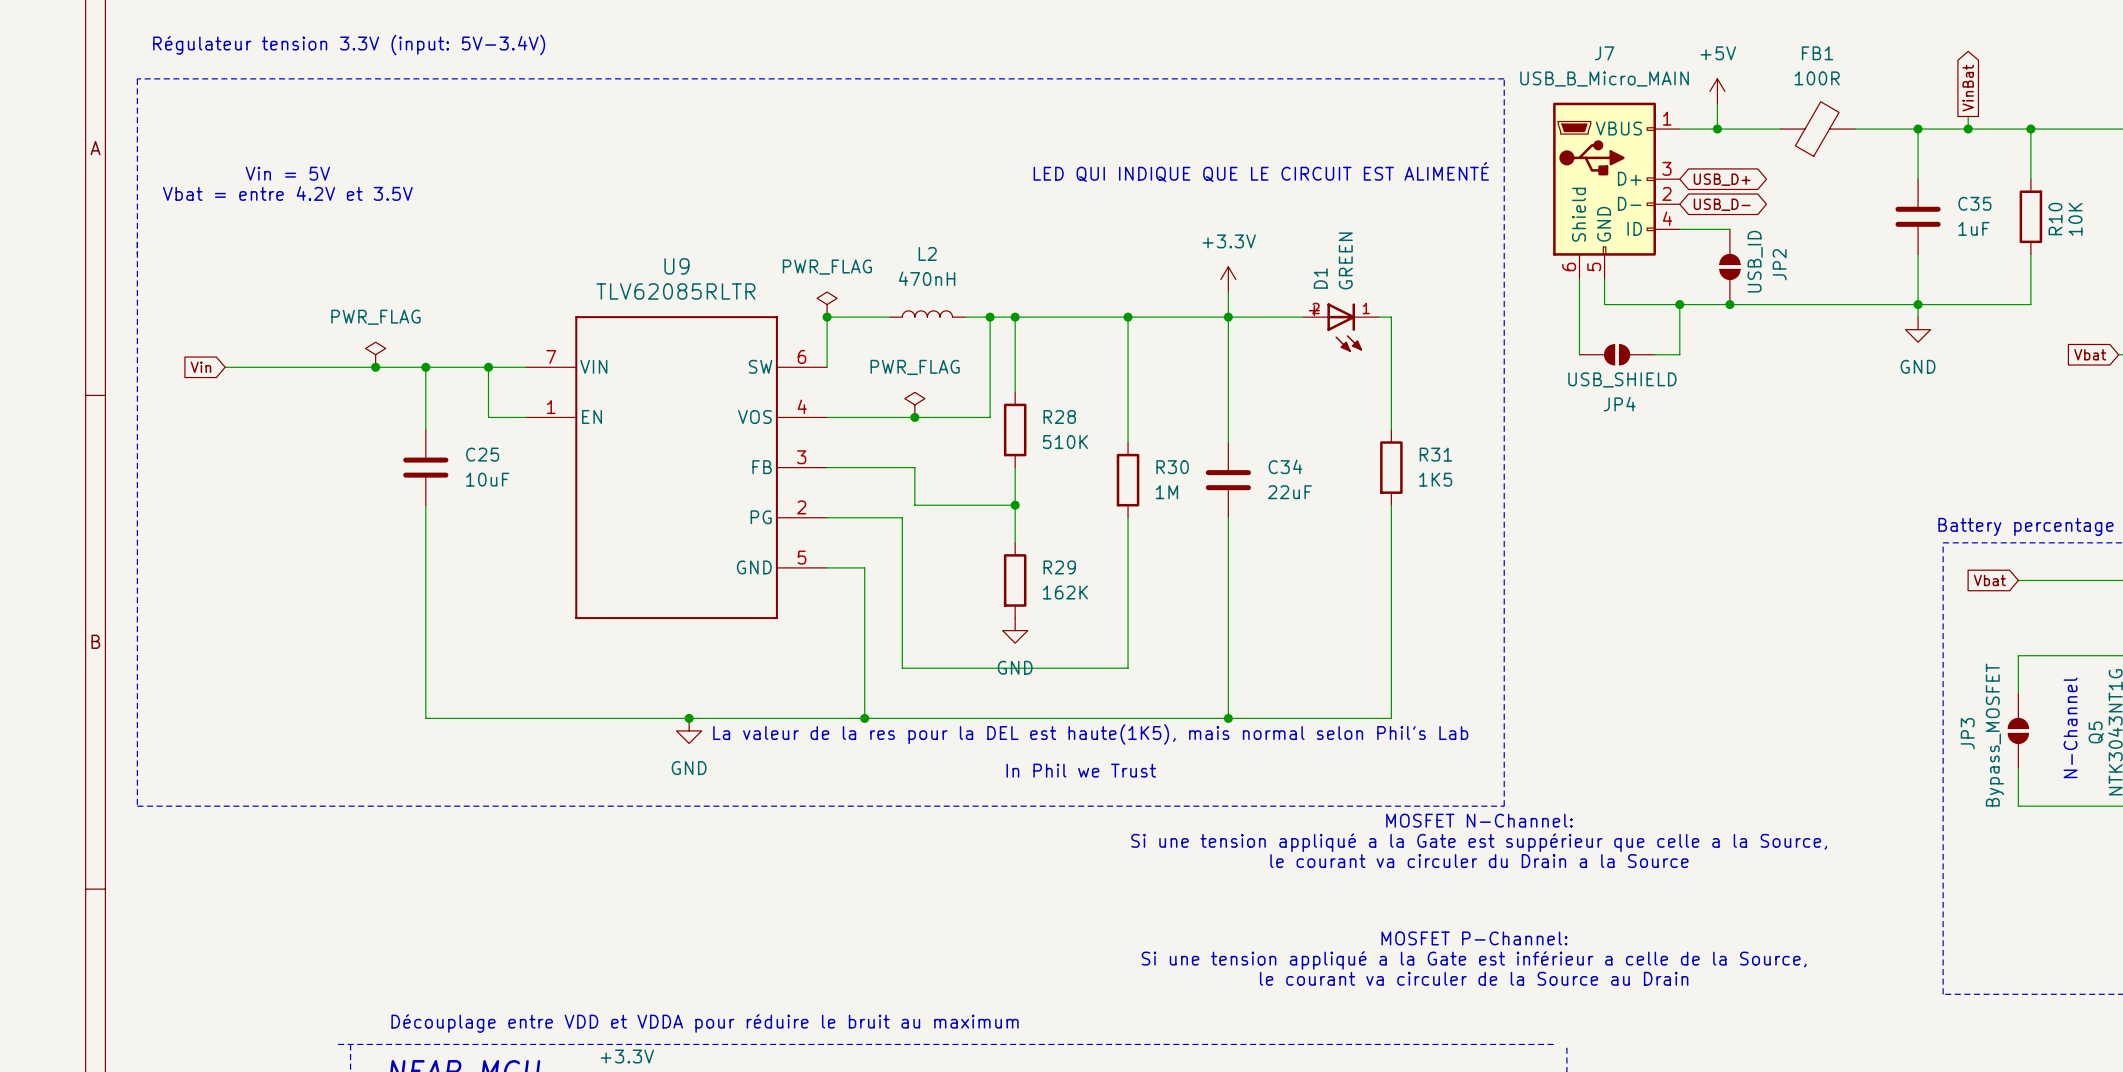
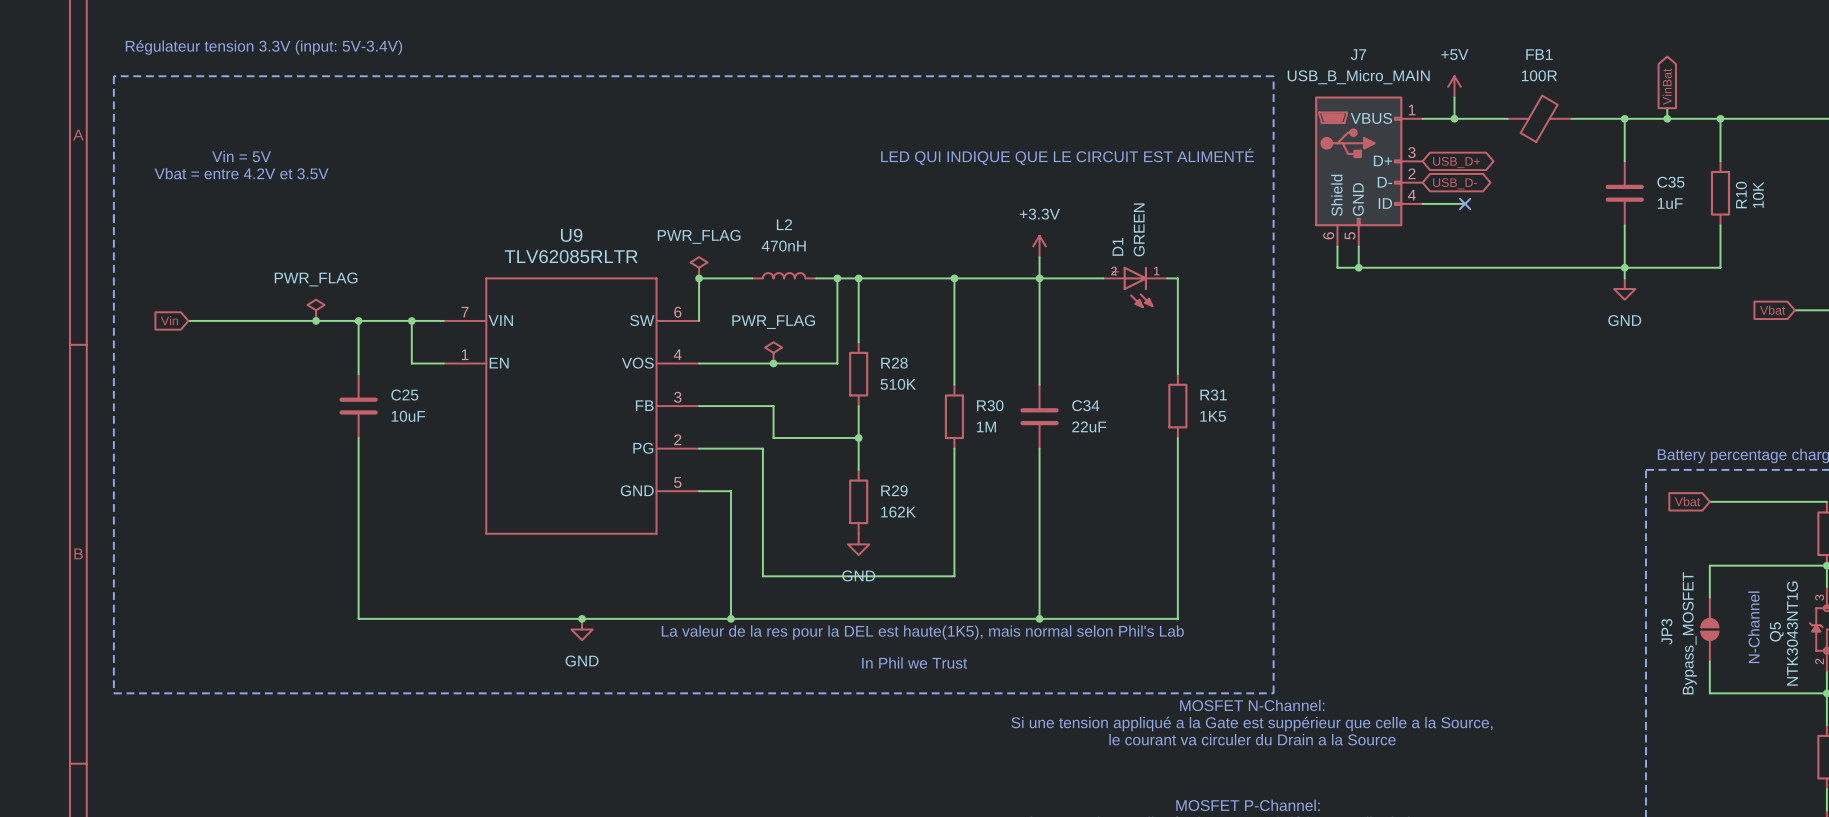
no-connect mark: none -> (1465, 203)
JP2: USB_ID (1729, 266) -> none
wire: (1579, 304) (1579, 354) -> (1337, 267) (1358, 267)
junction: none -> (1358, 267)
wire: (1679, 304) (1679, 354) (1654, 354) -> none
junction: (1679, 304) -> none
junction: (1729, 304) -> none
JP4: USB_SHIELD (1617, 354) -> none

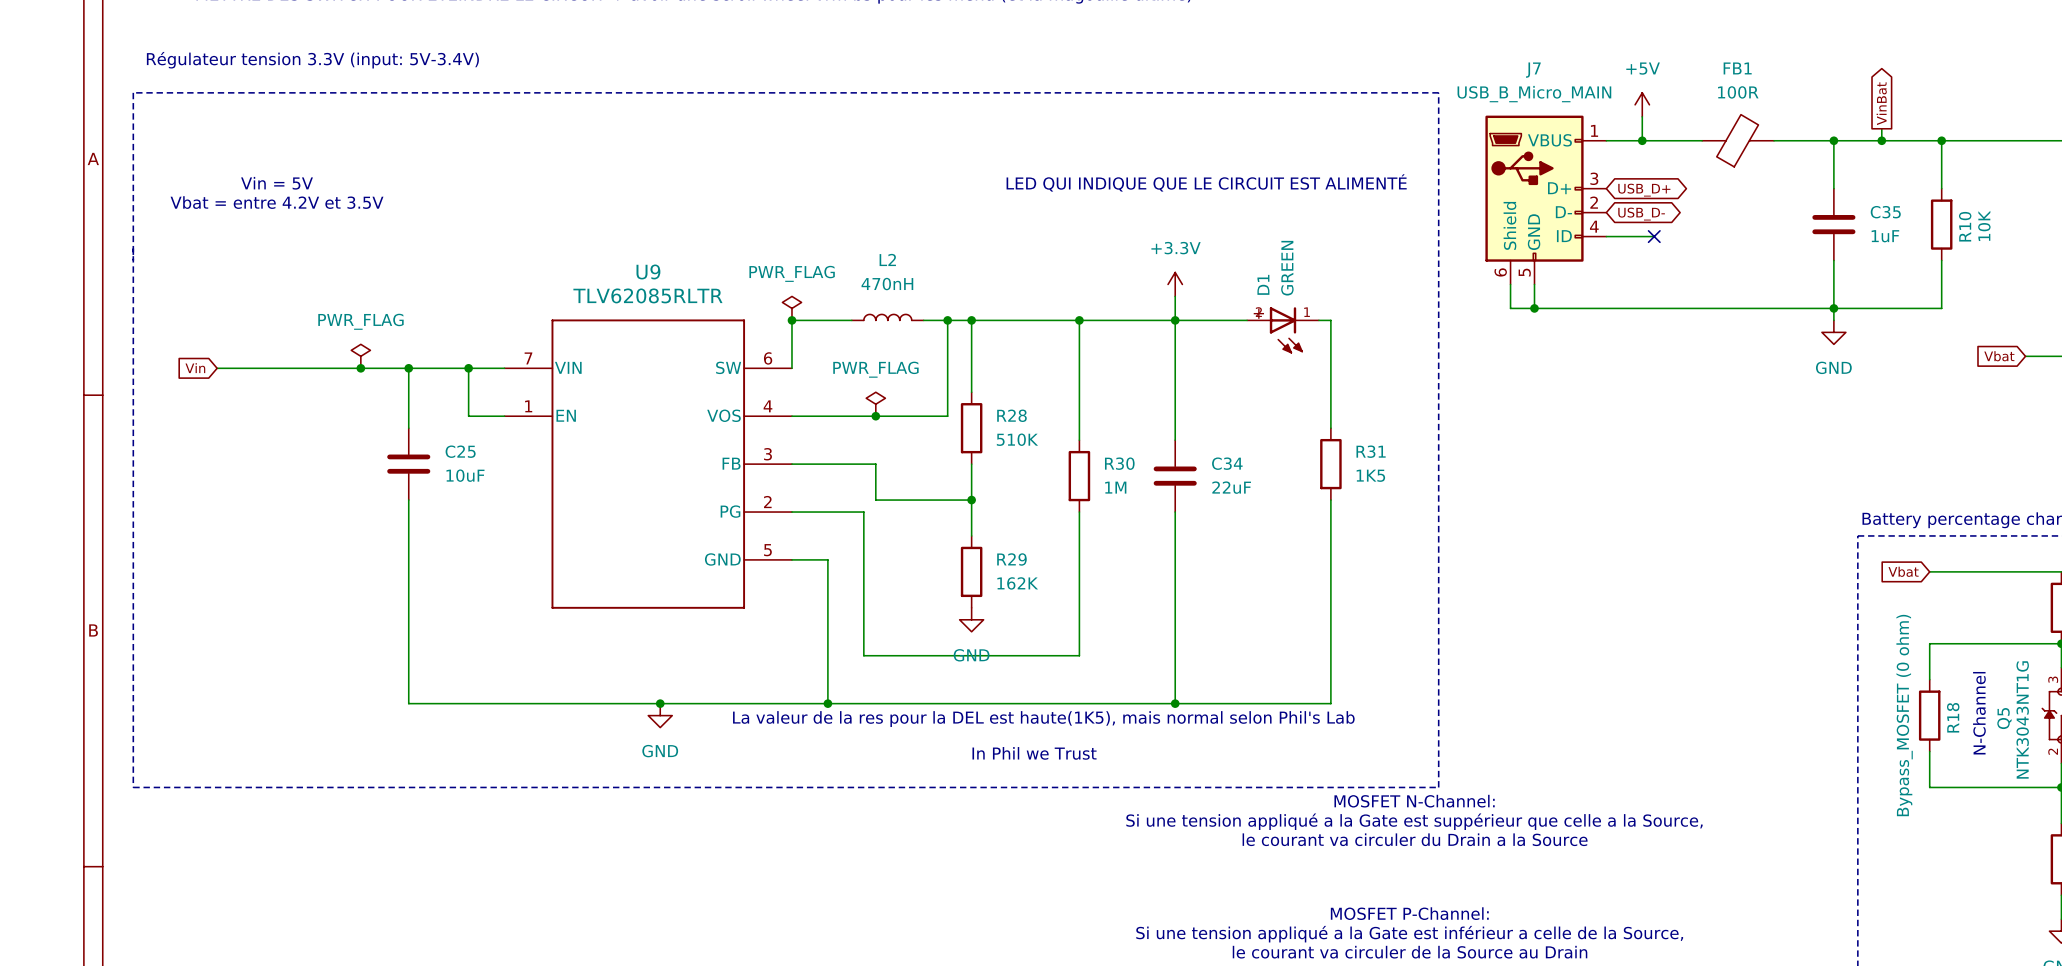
JP3: Bypass_MOSFET (1709, 629) -> none
R18: none -> Bypass_MOSFET (0 ohm) (1929, 715)

